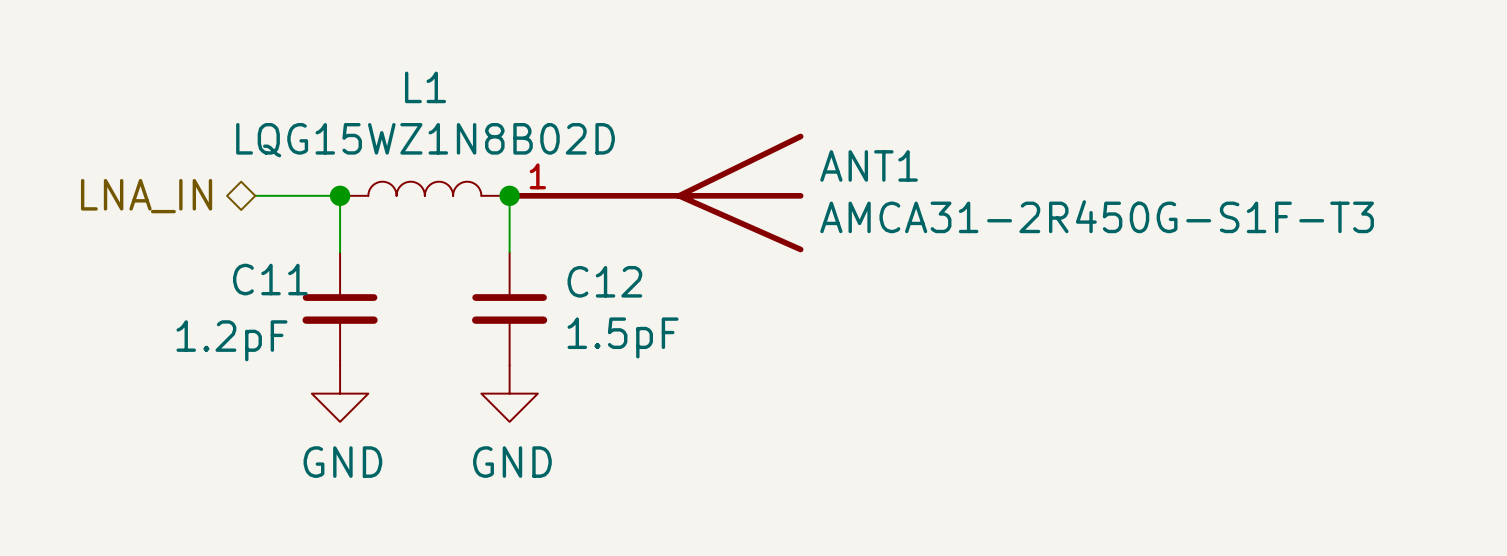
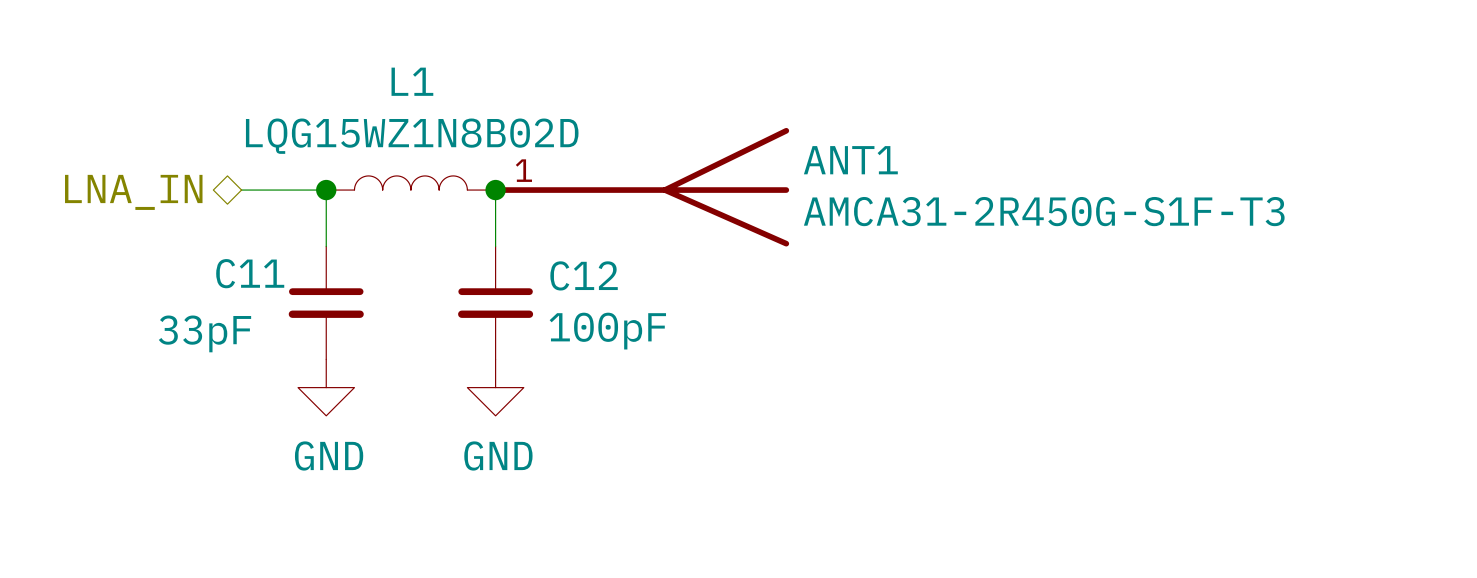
C12 value: 1.5pF (623, 337) -> 100pF (607, 331)
C11 value: 1.2pF (231, 340) -> 33pF (204, 333)

